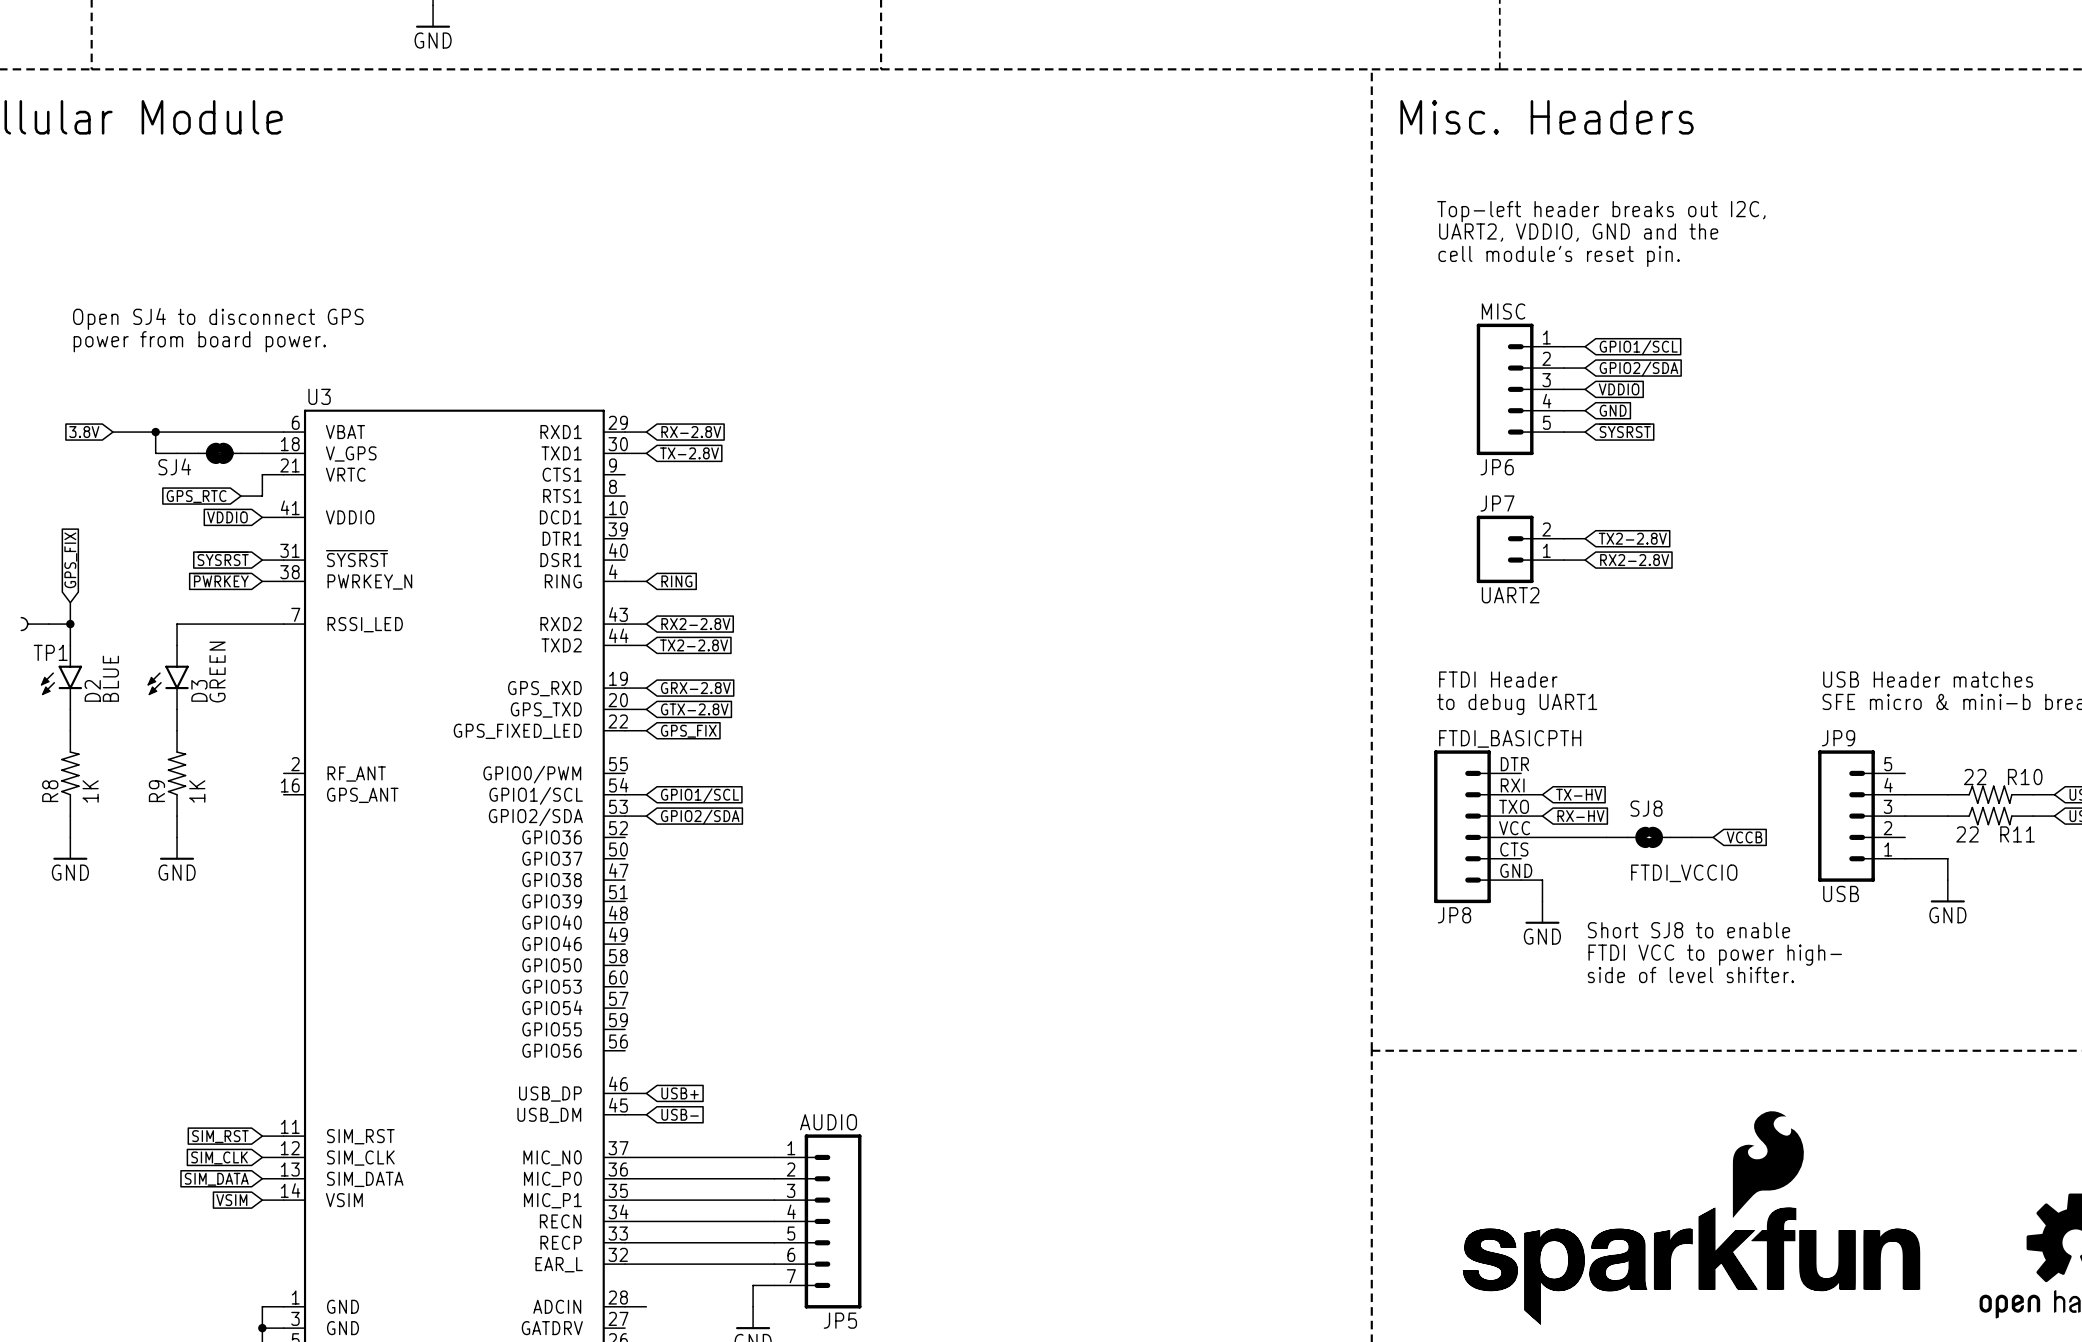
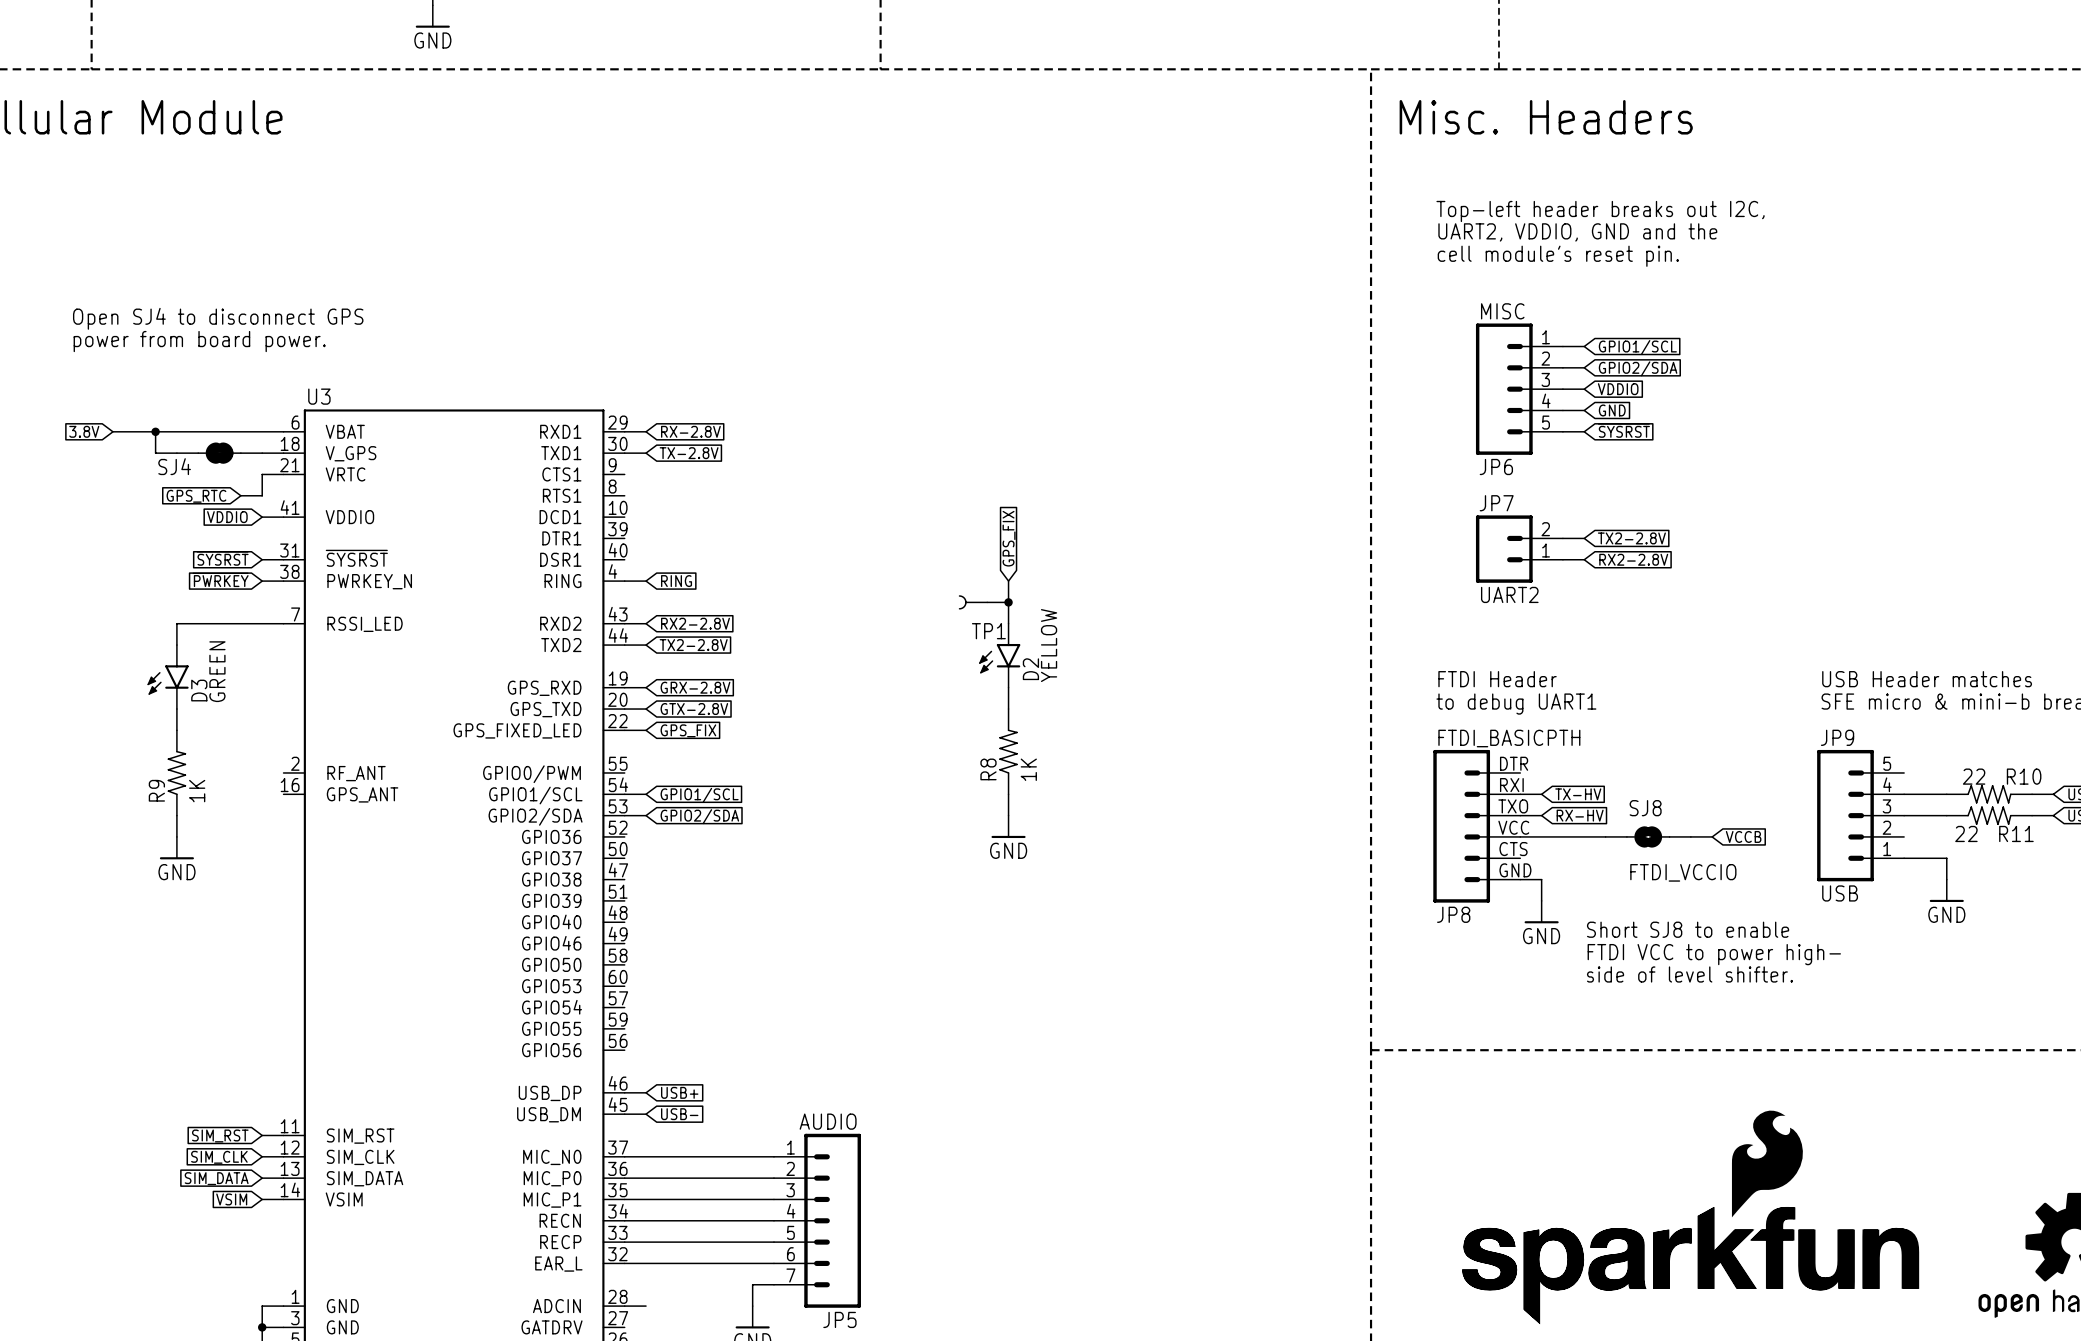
global label: none -> GPS_FIX (1009, 538)
global label: GPS_FIX (70, 560) -> none
wire: none -> (1008, 581) (1008, 623)
wire: (70, 602) (70, 645) -> none
wire: none -> (987, 602) (1008, 602)
junction: none -> (1008, 602)
TP1 position: (35, 624) -> (973, 602)
wire: (49, 624) (70, 624) -> none
junction: (70, 624) -> none
D2 position: (61, 677) -> (999, 655)
D2 value: BLUE (110, 678) -> YELLOW (1049, 645)
wire: none -> (1008, 687) (1008, 709)
wire: (70, 709) (70, 730) -> none
R8 position: (70, 773) -> (1008, 751)
wire: none -> (1008, 794) (1008, 815)
wire: (70, 816) (70, 837) -> none
power symbol: none -> GND (1008, 826)
power symbol: GND (70, 848) -> none

